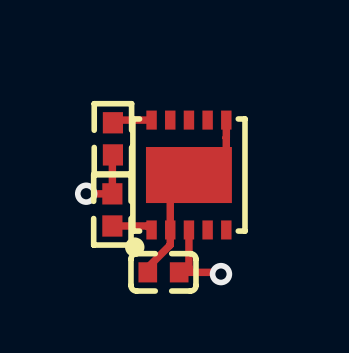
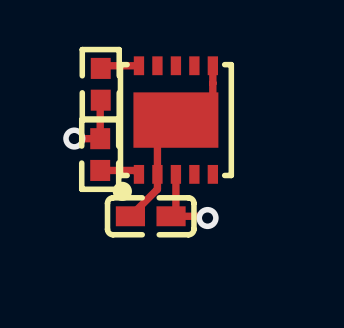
part footprint: [128, 250, 199, 294] -> [104, 195, 197, 238]

